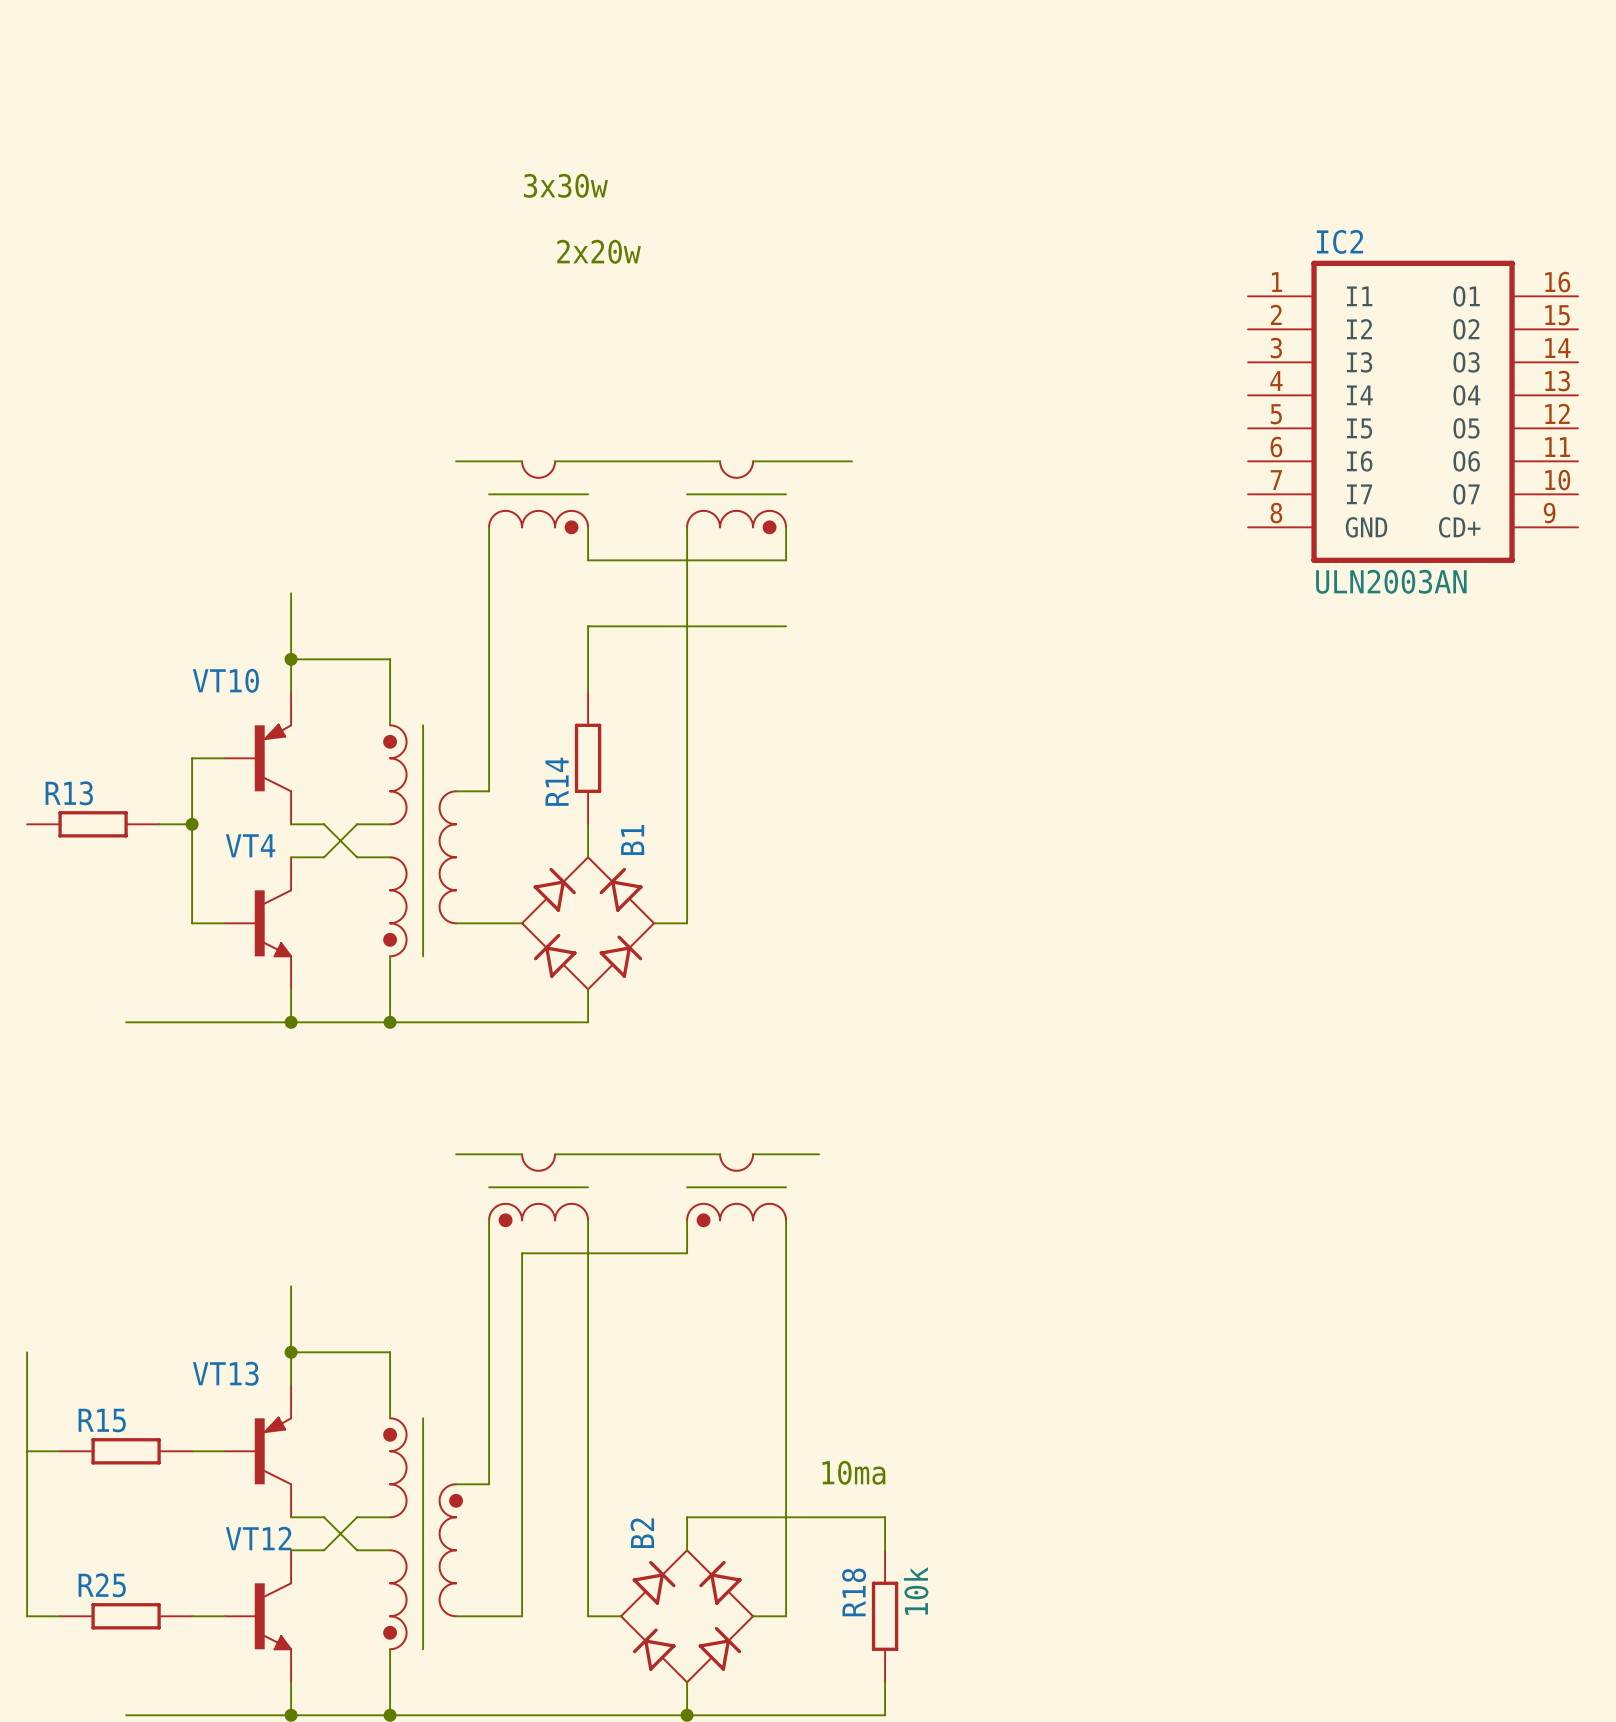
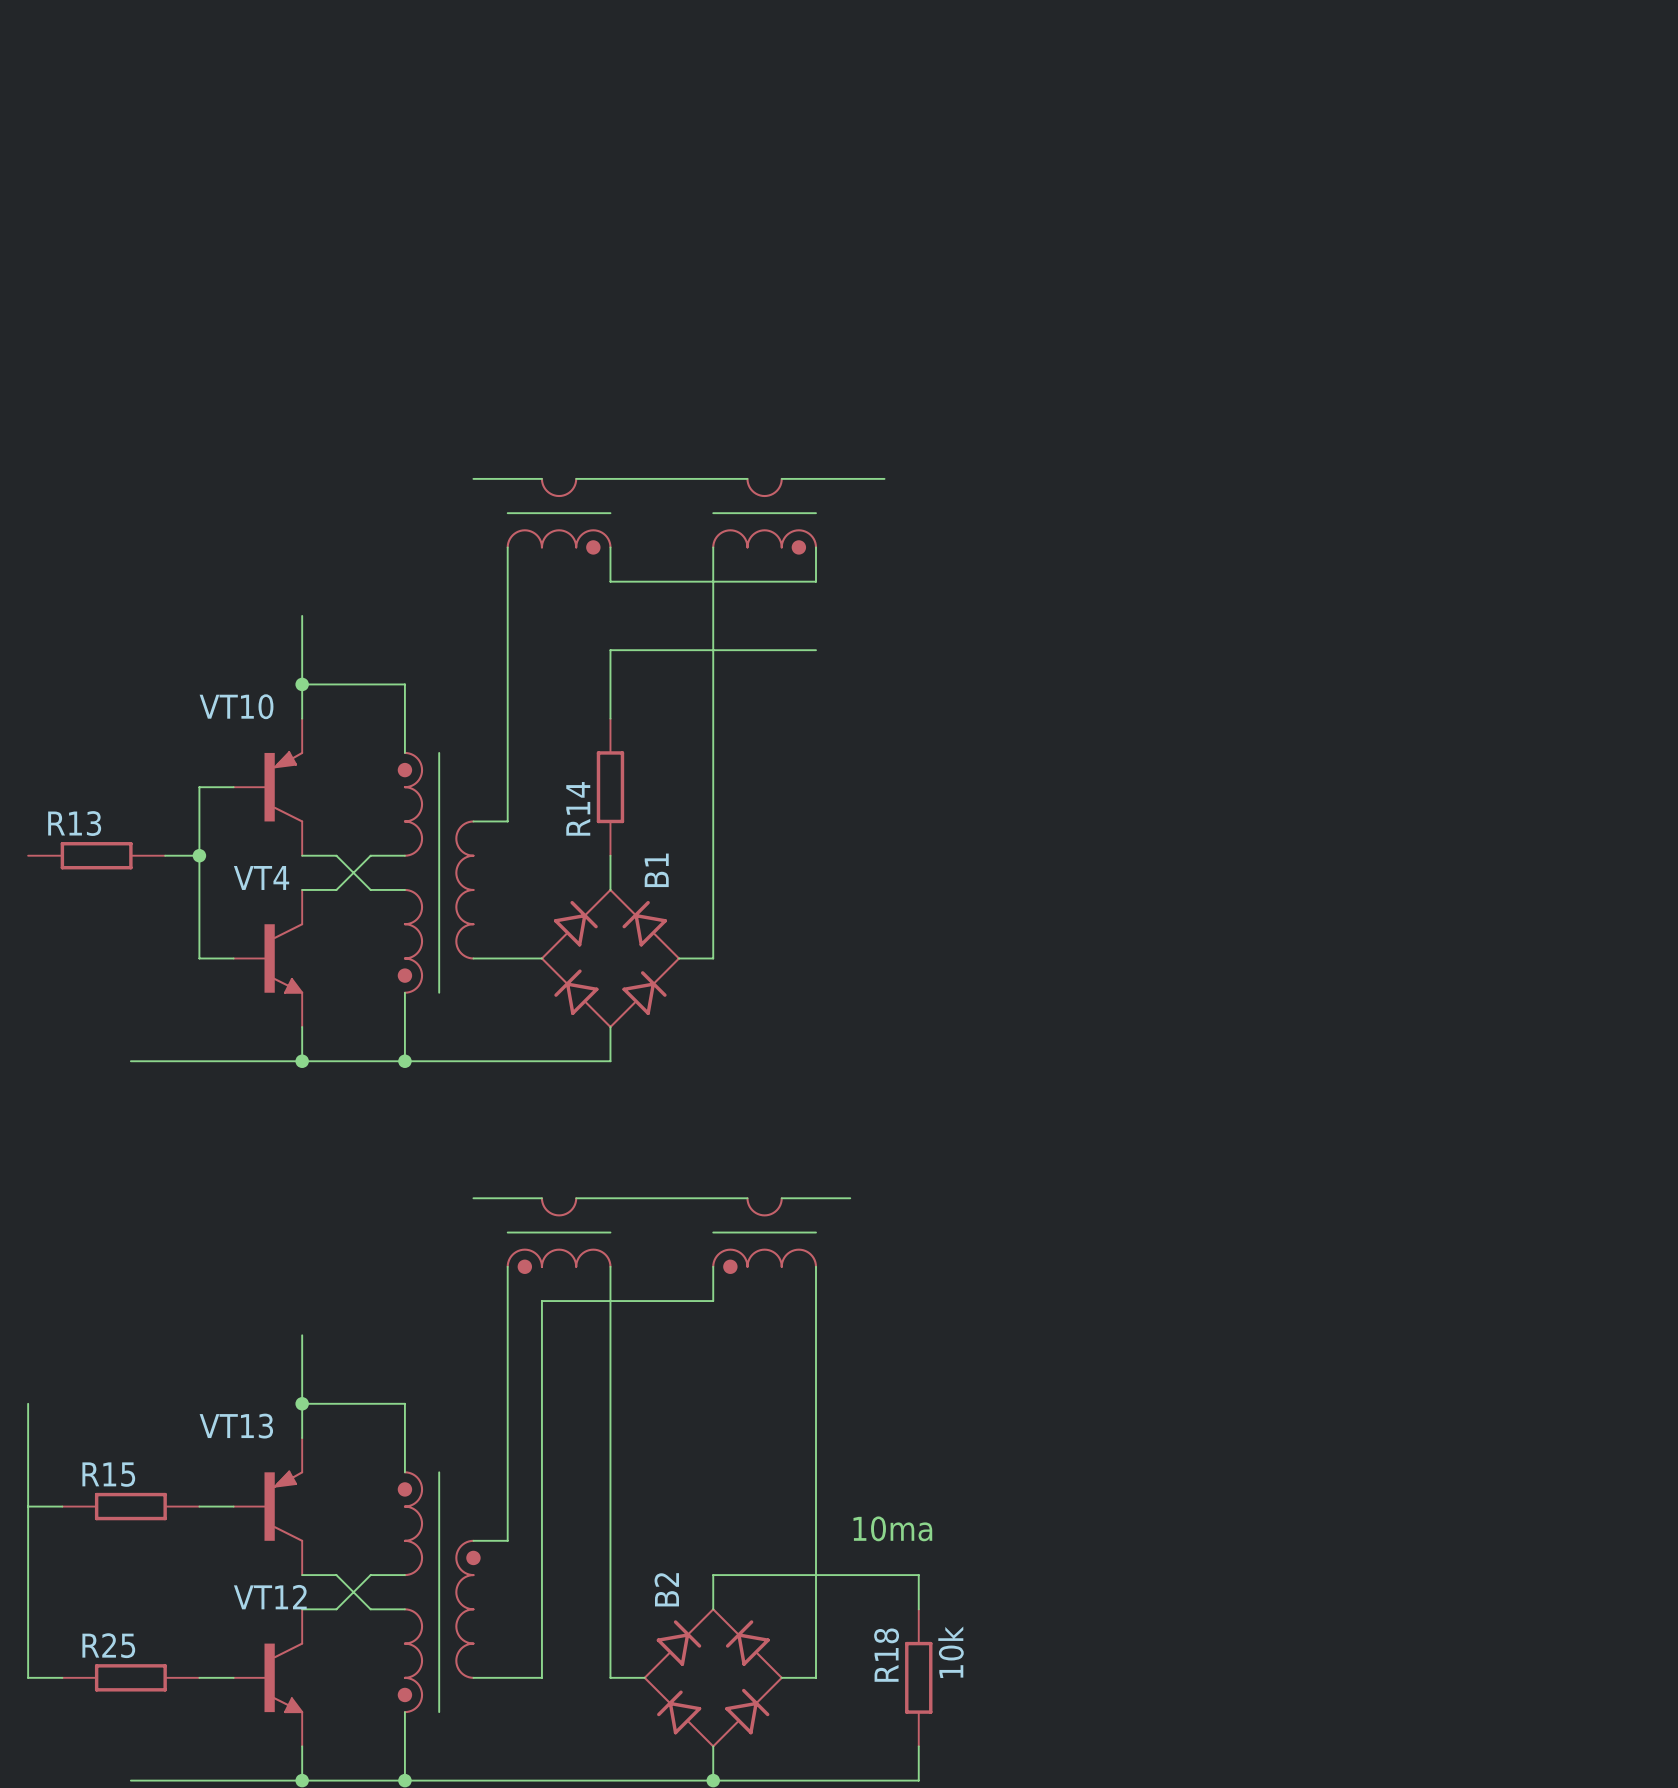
text: 3x30w (565, 185) -> none
text: 2x20w (599, 251) -> none
IC2: ULN2003AN (1413, 411) -> none

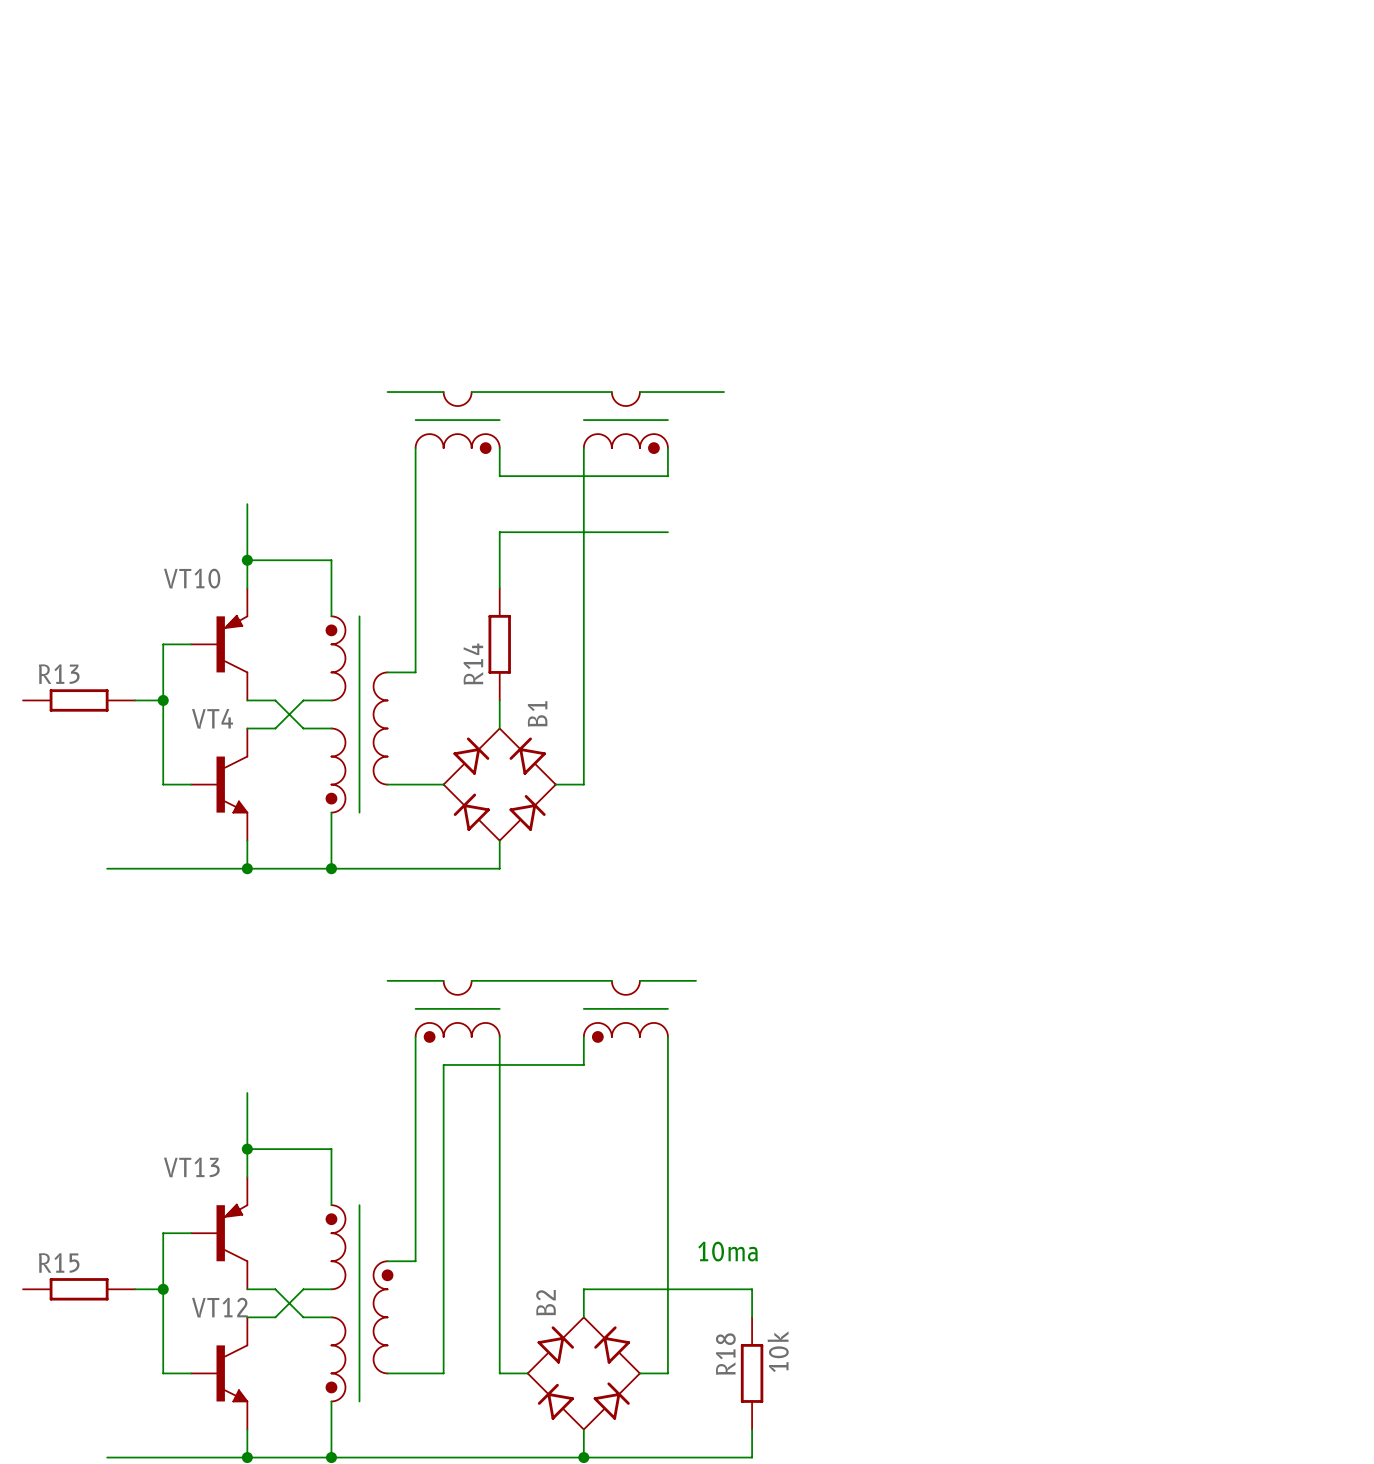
wire: (28, 1403) (28, 1677) (62, 1677) -> none
wire: (28, 1506) (62, 1506) -> (135, 1289) (163, 1289)
R15 position: (130, 1506) -> (79, 1289)
wire: none -> (163, 1233) (163, 1373)
junction: none -> (163, 1289)
R25: (130, 1677) -> none

